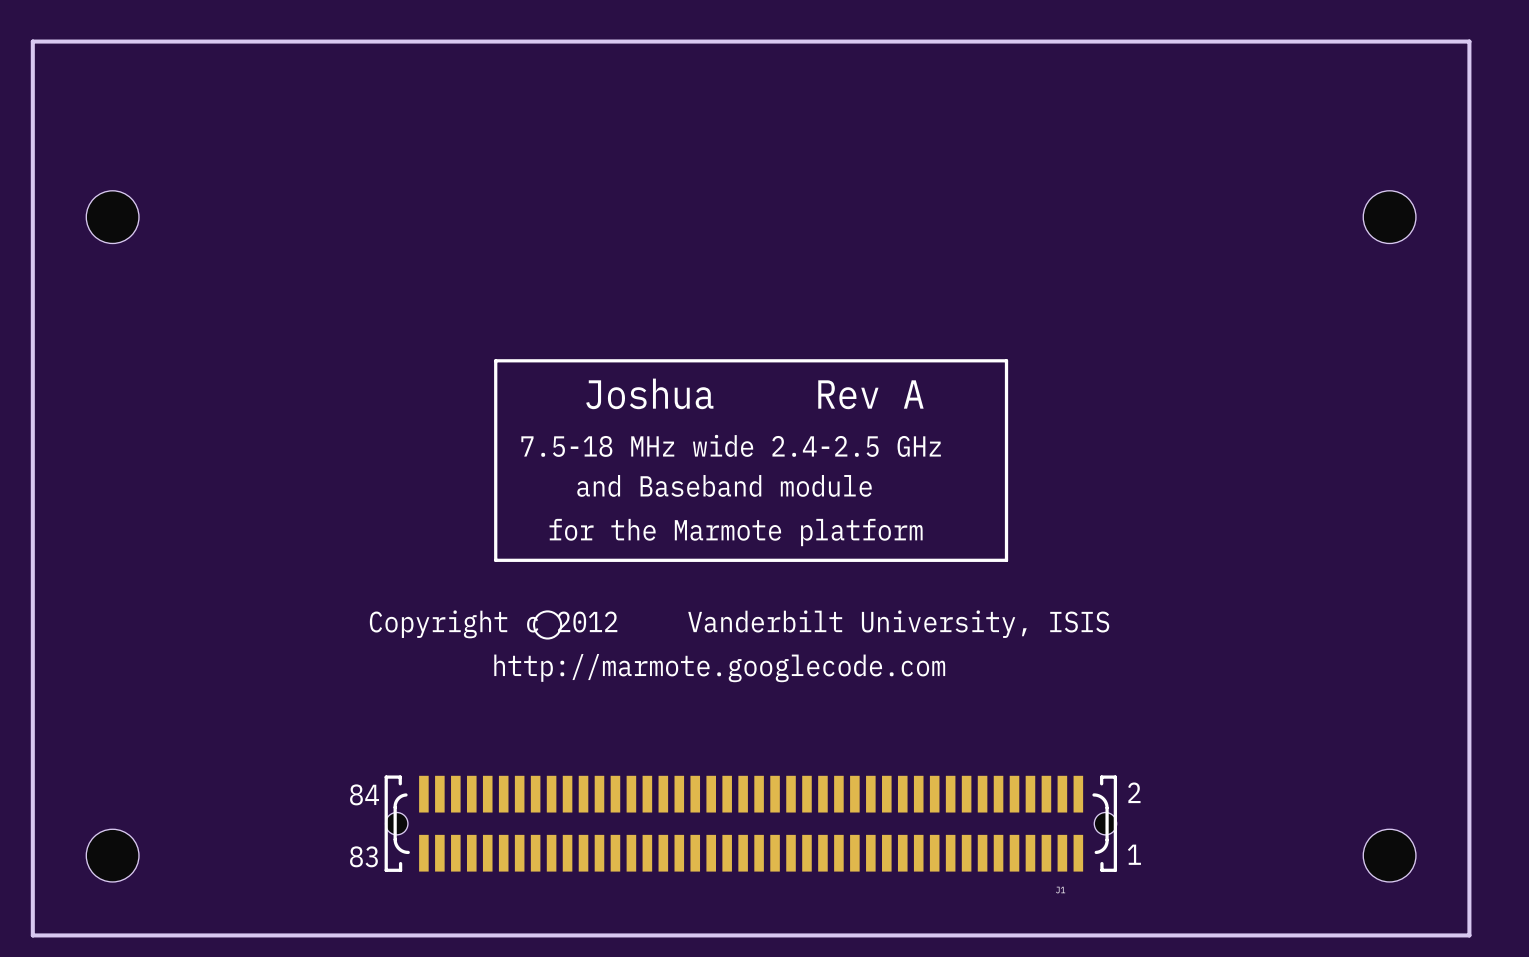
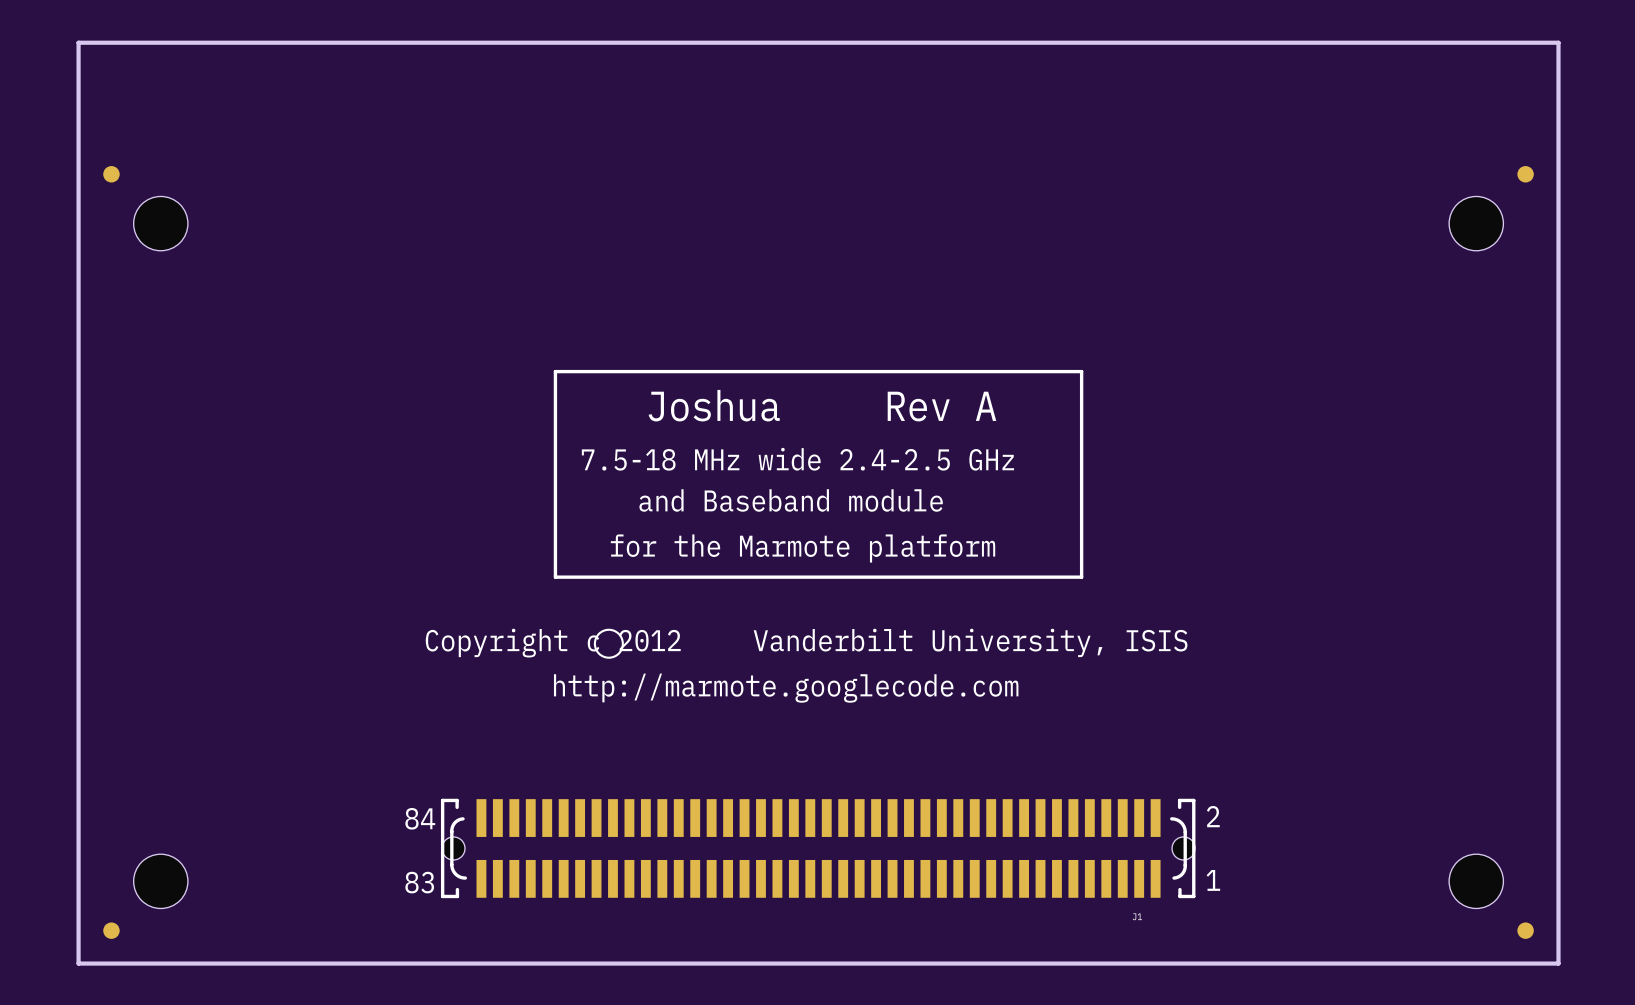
part: none -> (111, 174)
part: none -> (1525, 174)
part: none -> (111, 930)
part: none -> (1525, 930)

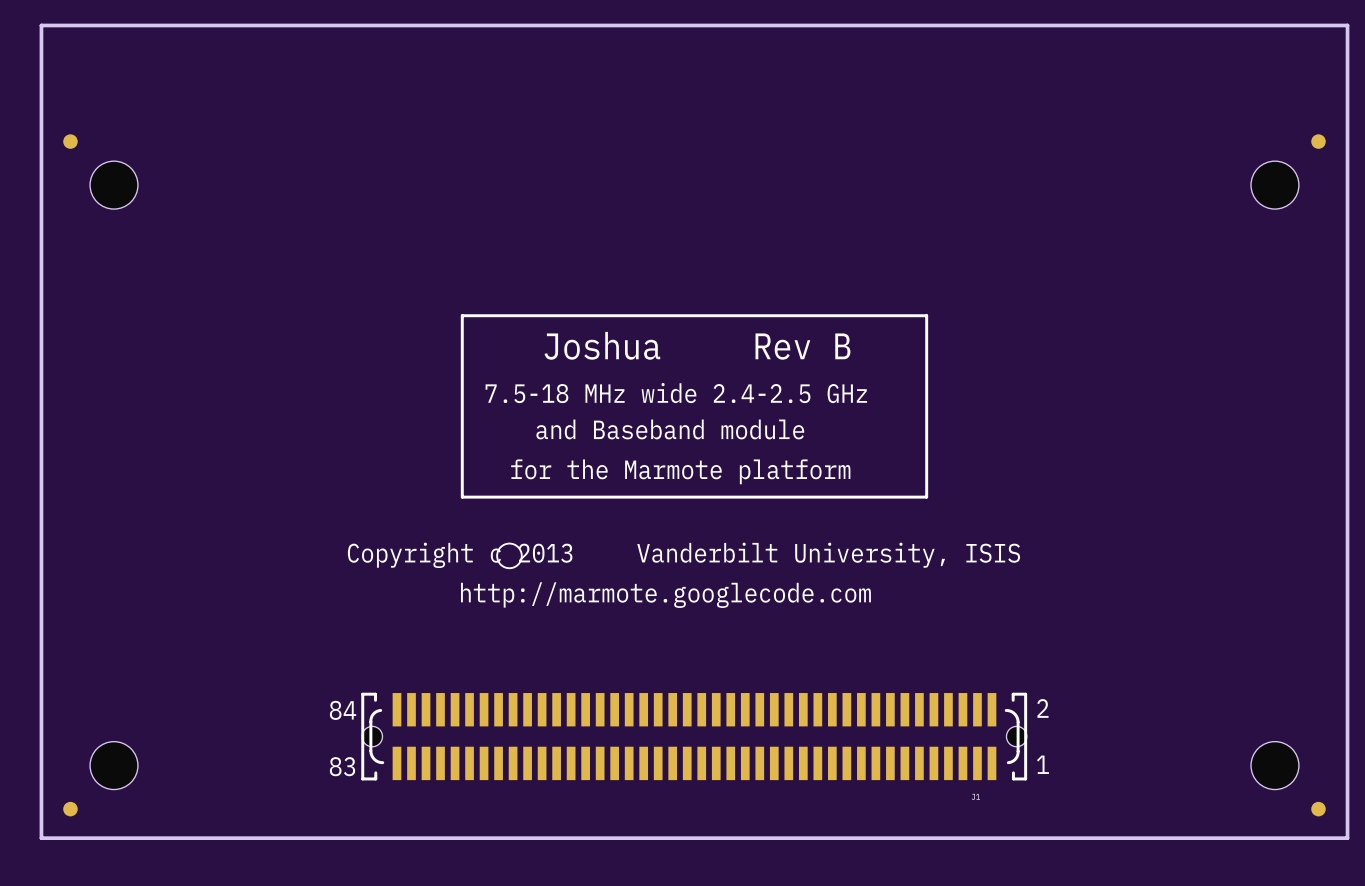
text: A (986, 406) -> B (842, 346)
text: Copyright c 2012 (553, 643) -> Copyright c 2013 (460, 555)

